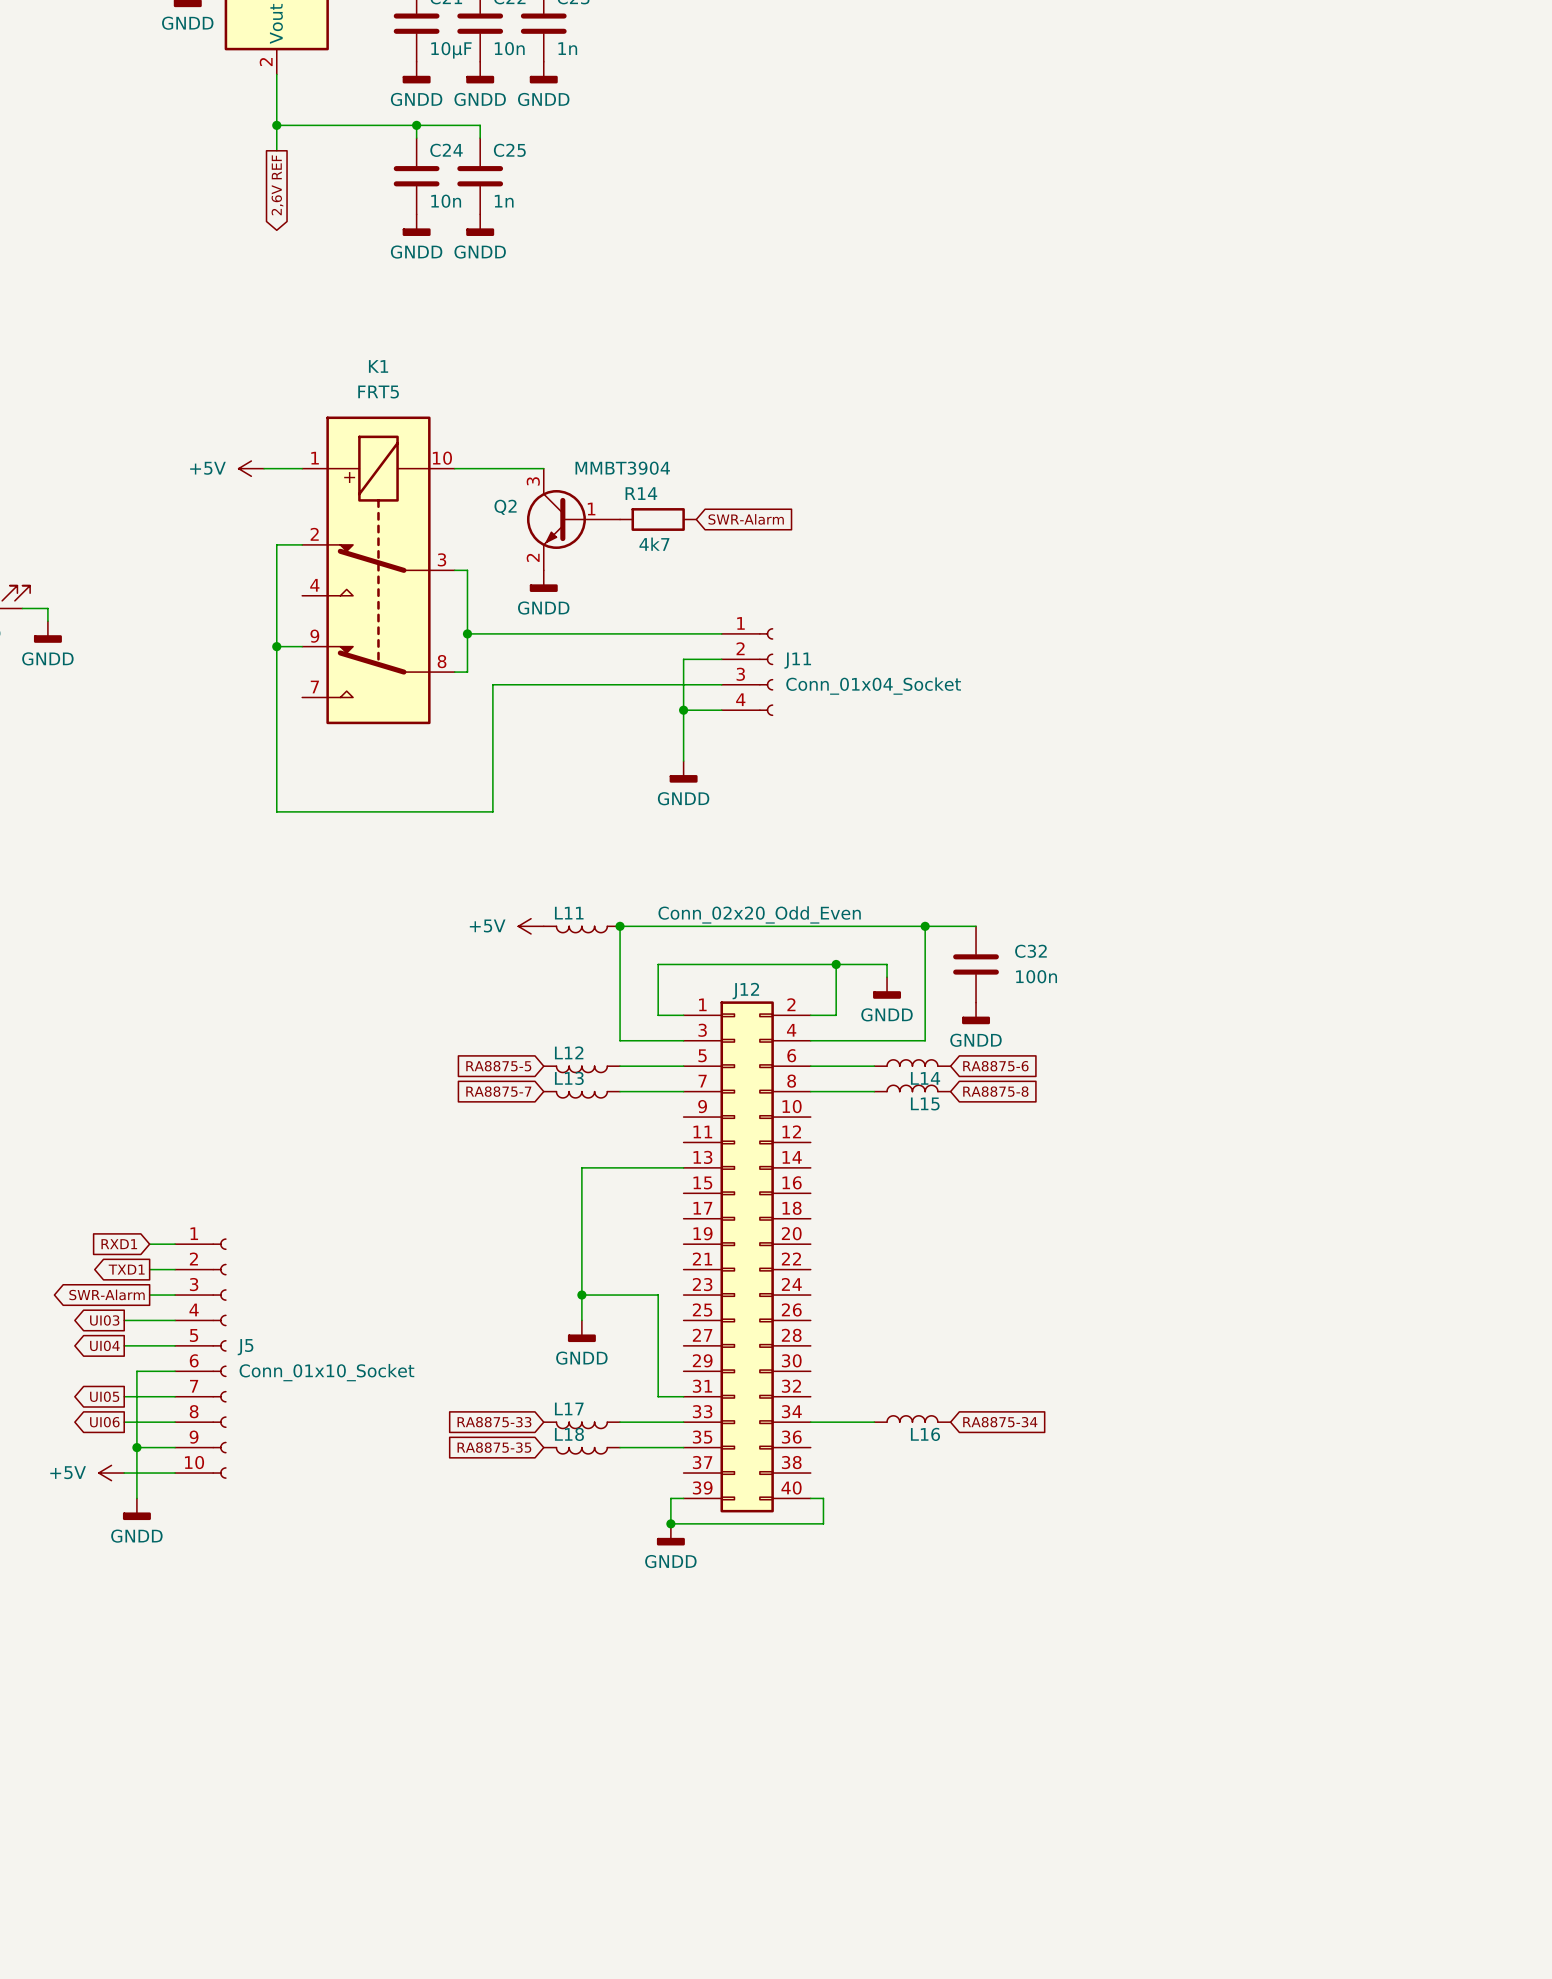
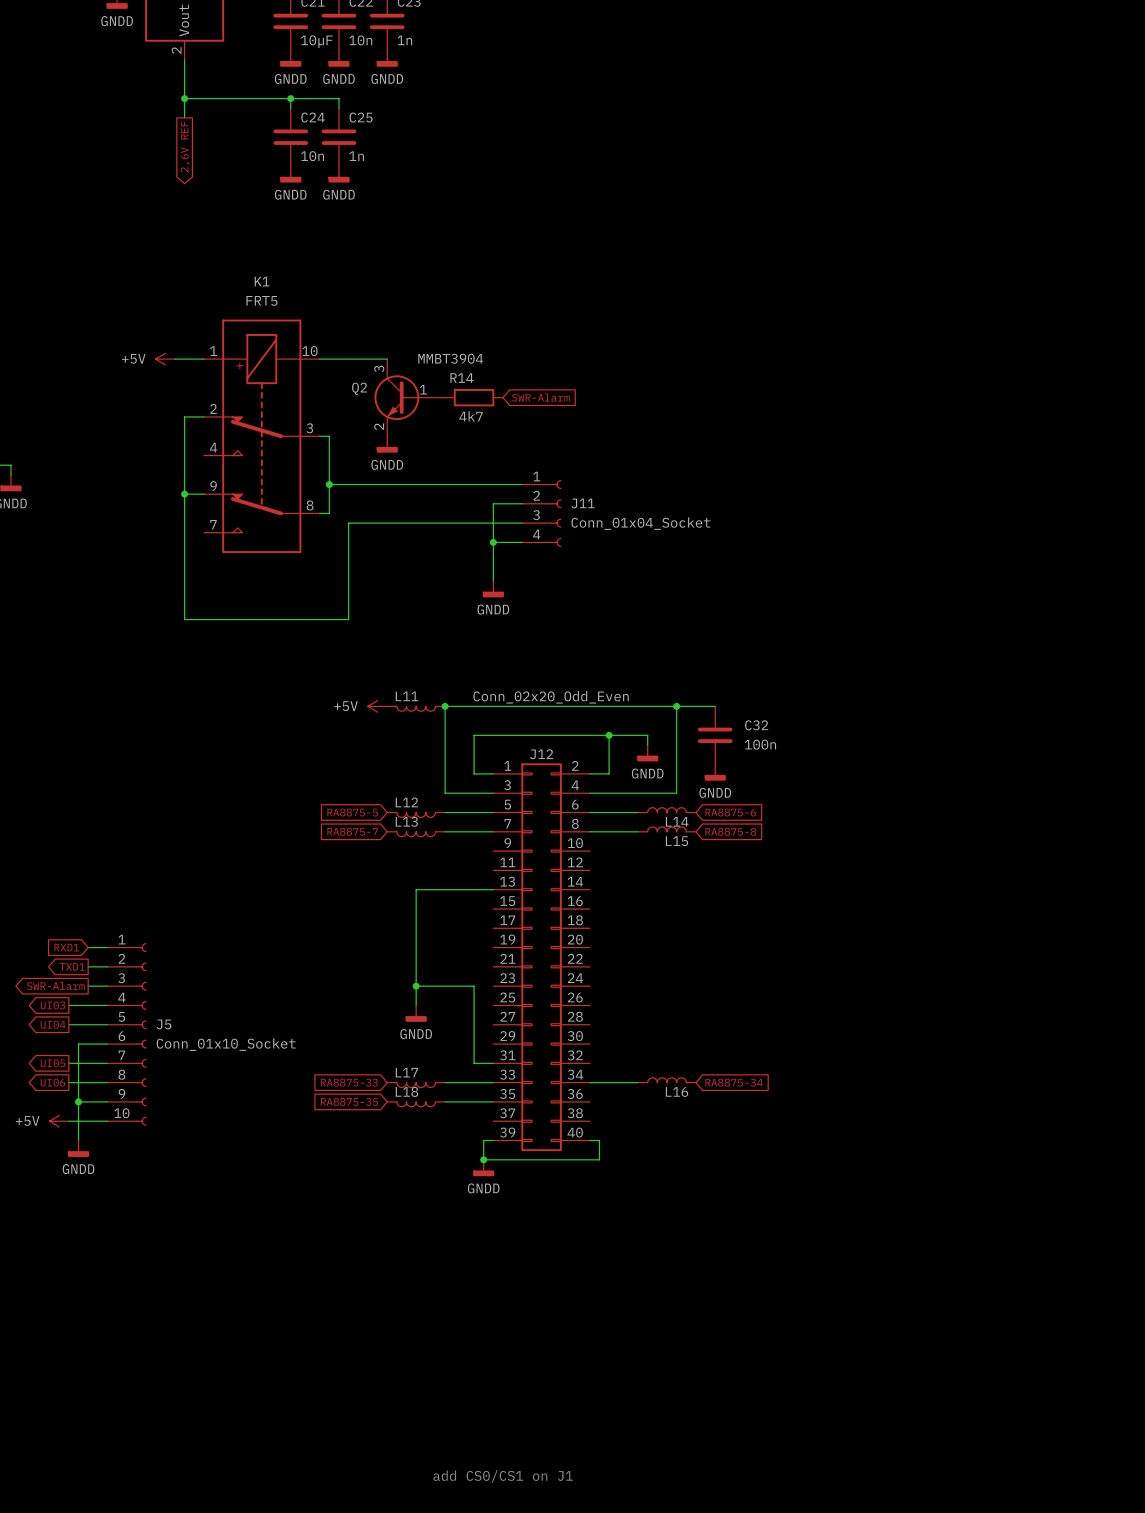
text: none -> add CS0/CS1 on J1 (503, 1476)

